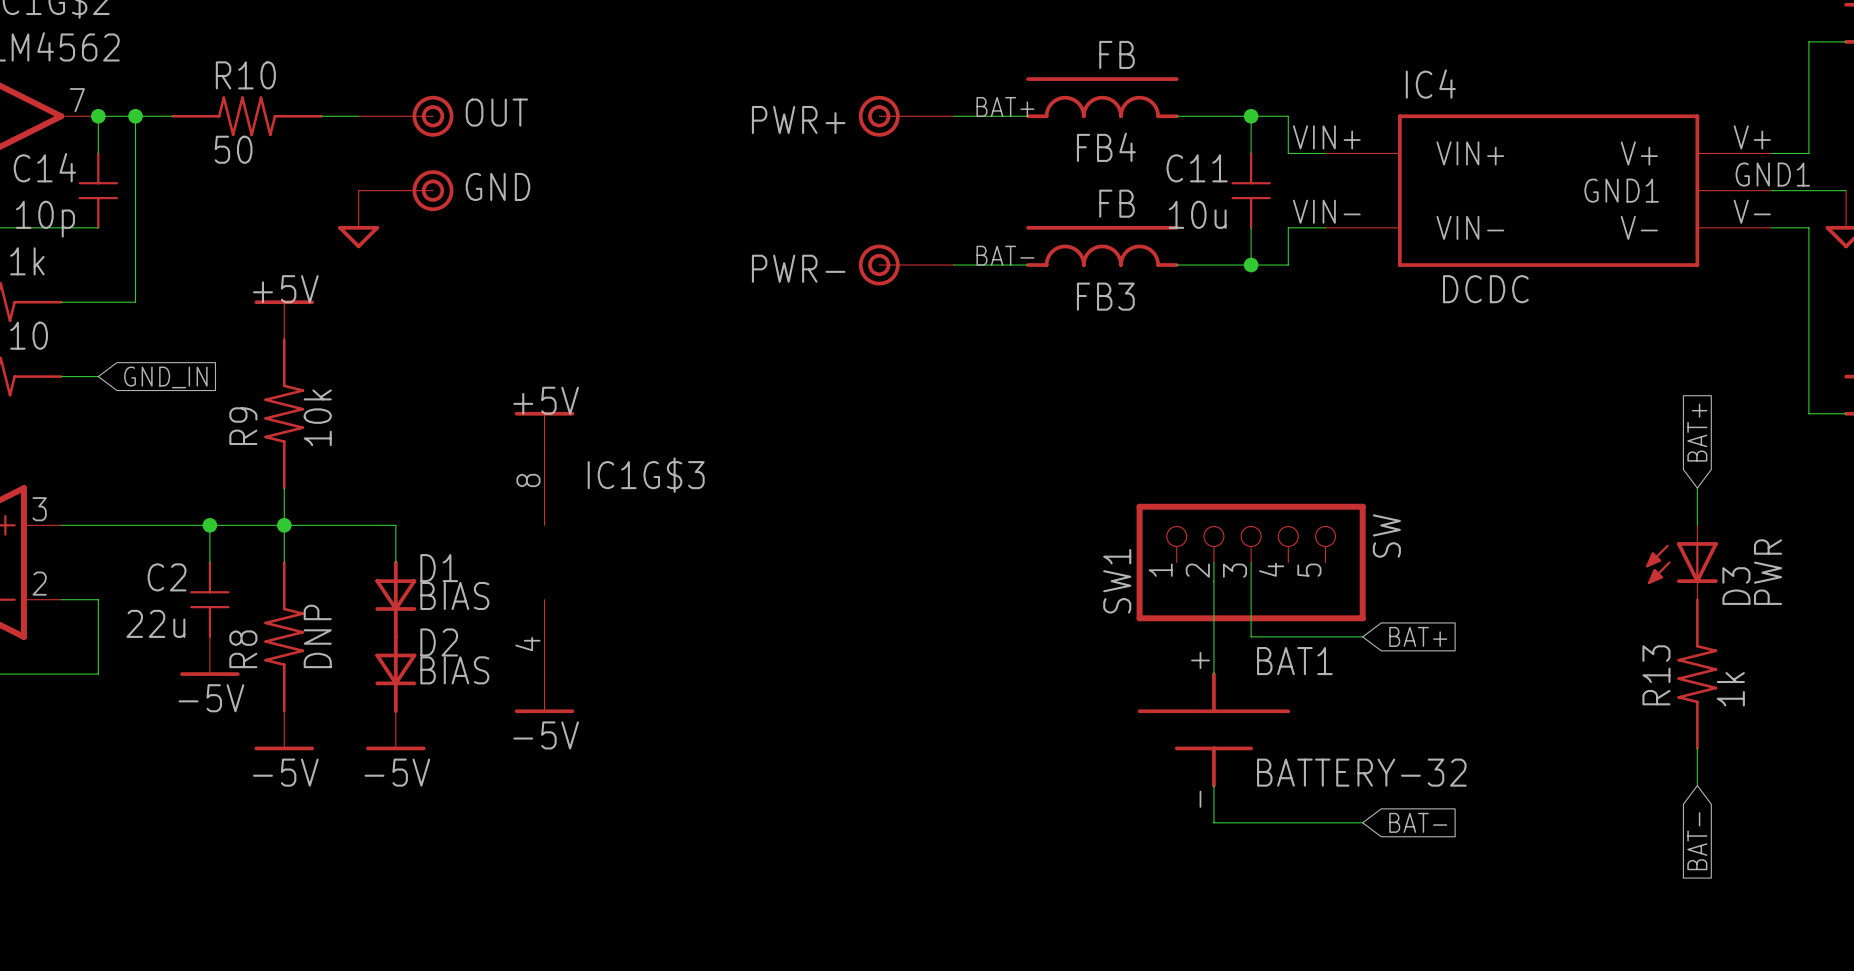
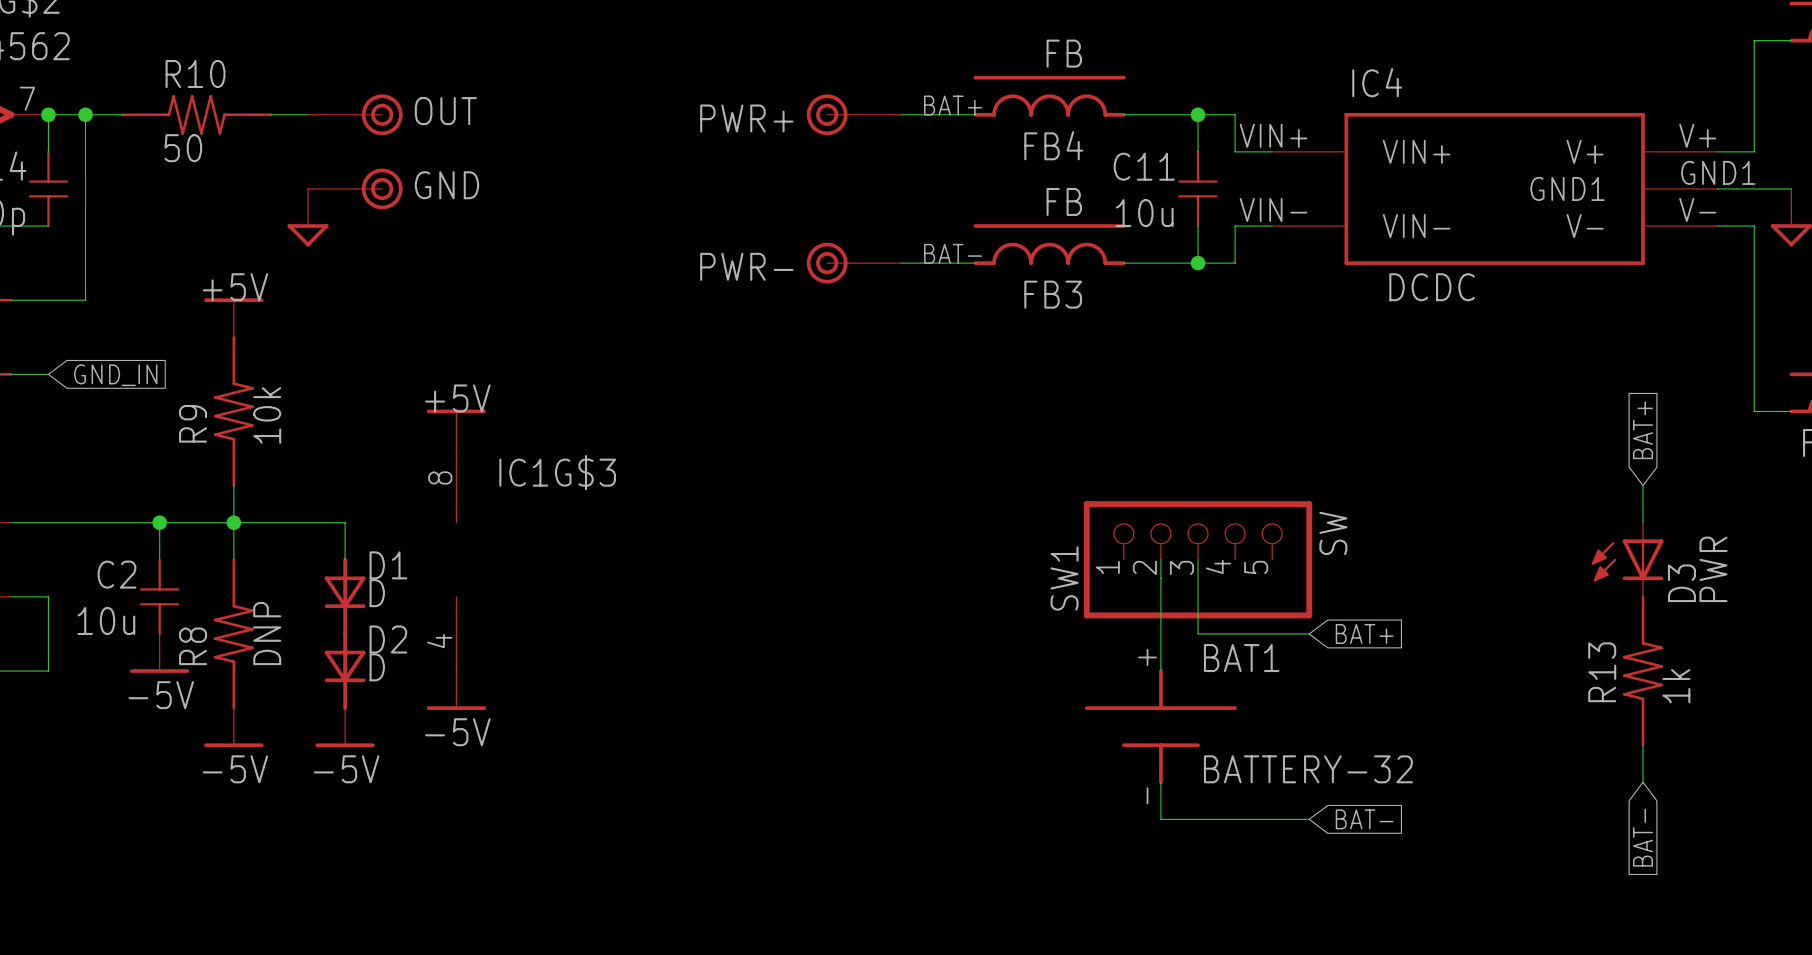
power symbol position: +5V (544, 431) -> +5V (456, 429)
IC1G$3 position: (544, 562) -> (456, 559)
D1 value: BIAS (454, 595) -> D (377, 593)
C2 value: 22u (155, 623) -> 10u (106, 620)
D2 value: BIAS (454, 670) -> D (377, 667)
power symbol position: -5V (544, 693) -> -5V (456, 690)

